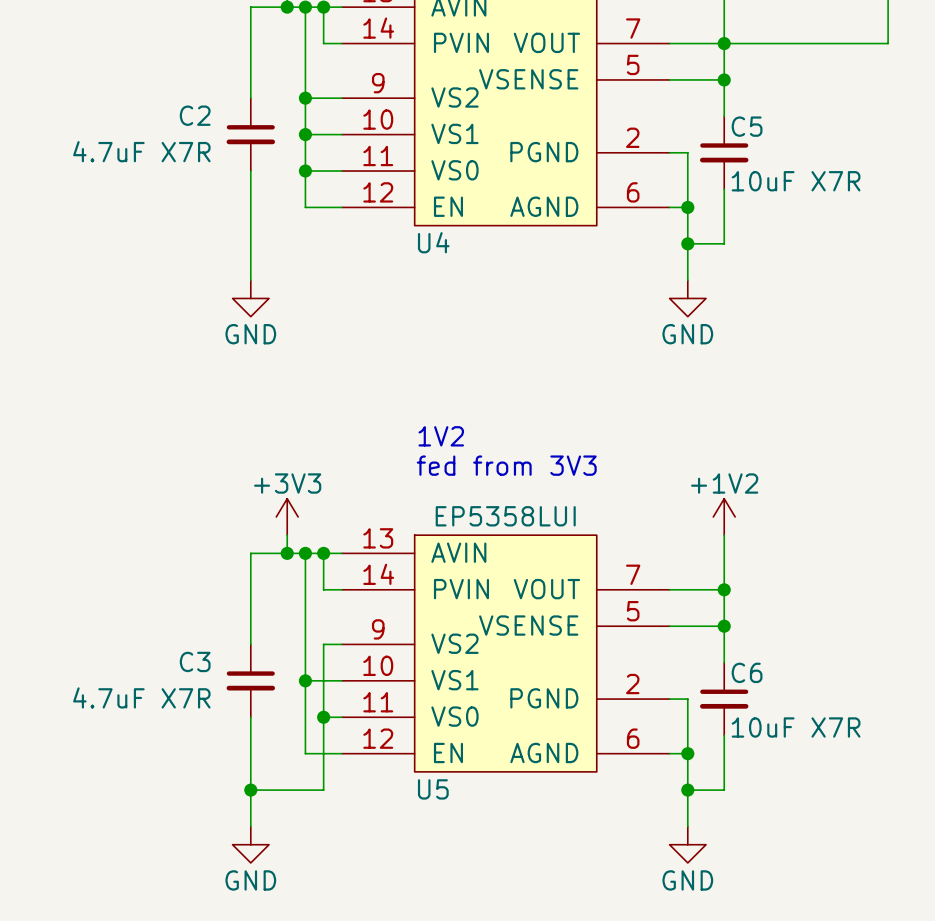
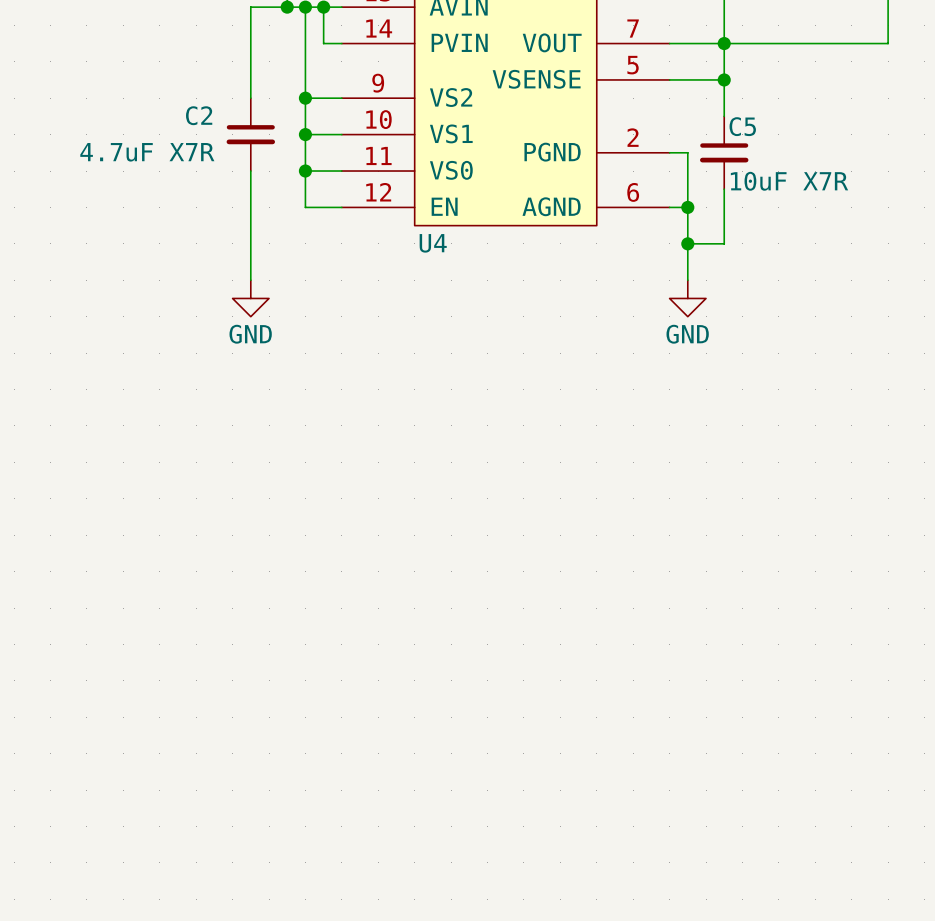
text: 1V2 (441, 436) -> none
text: fed from 3V3 (506, 465) -> none
power symbol: +3V3 (287, 516) -> none
power symbol: +1V2 (724, 516) -> none
wire: (287, 535) (287, 553) -> none
wire: (724, 535) (724, 662) -> none
junction: (287, 553) -> none
wire: (305, 553) (305, 753) (341, 753) -> none
junction: (305, 553) -> none
wire: (323, 553) (323, 589) (341, 589) -> none
junction: (323, 553) -> none
wire: (341, 553) (250, 553) (250, 644) -> none
wire: (669, 589) (724, 589) -> none
junction: (724, 589) -> none
wire: (669, 626) (724, 626) -> none
junction: (724, 626) -> none
wire: (341, 644) (323, 644) (323, 790) (250, 790) -> none
U5: EP5358LUI (505, 653) -> none
C3: 4.7uF X7R (250, 680) -> none
wire: (305, 680) (341, 680) -> none
junction: (305, 680) -> none
wire: (669, 699) (687, 699) (687, 826) -> none
C6: 10uF X7R (724, 699) -> none
wire: (250, 717) (250, 826) -> none
wire: (323, 717) (341, 717) -> none
junction: (323, 717) -> none
wire: (724, 735) (724, 790) (687, 790) -> none
wire: (669, 753) (687, 753) -> none
junction: (687, 753) -> none
junction: (250, 790) -> none
junction: (687, 790) -> none
power symbol: GND (250, 844) -> none
power symbol: GND (687, 844) -> none

